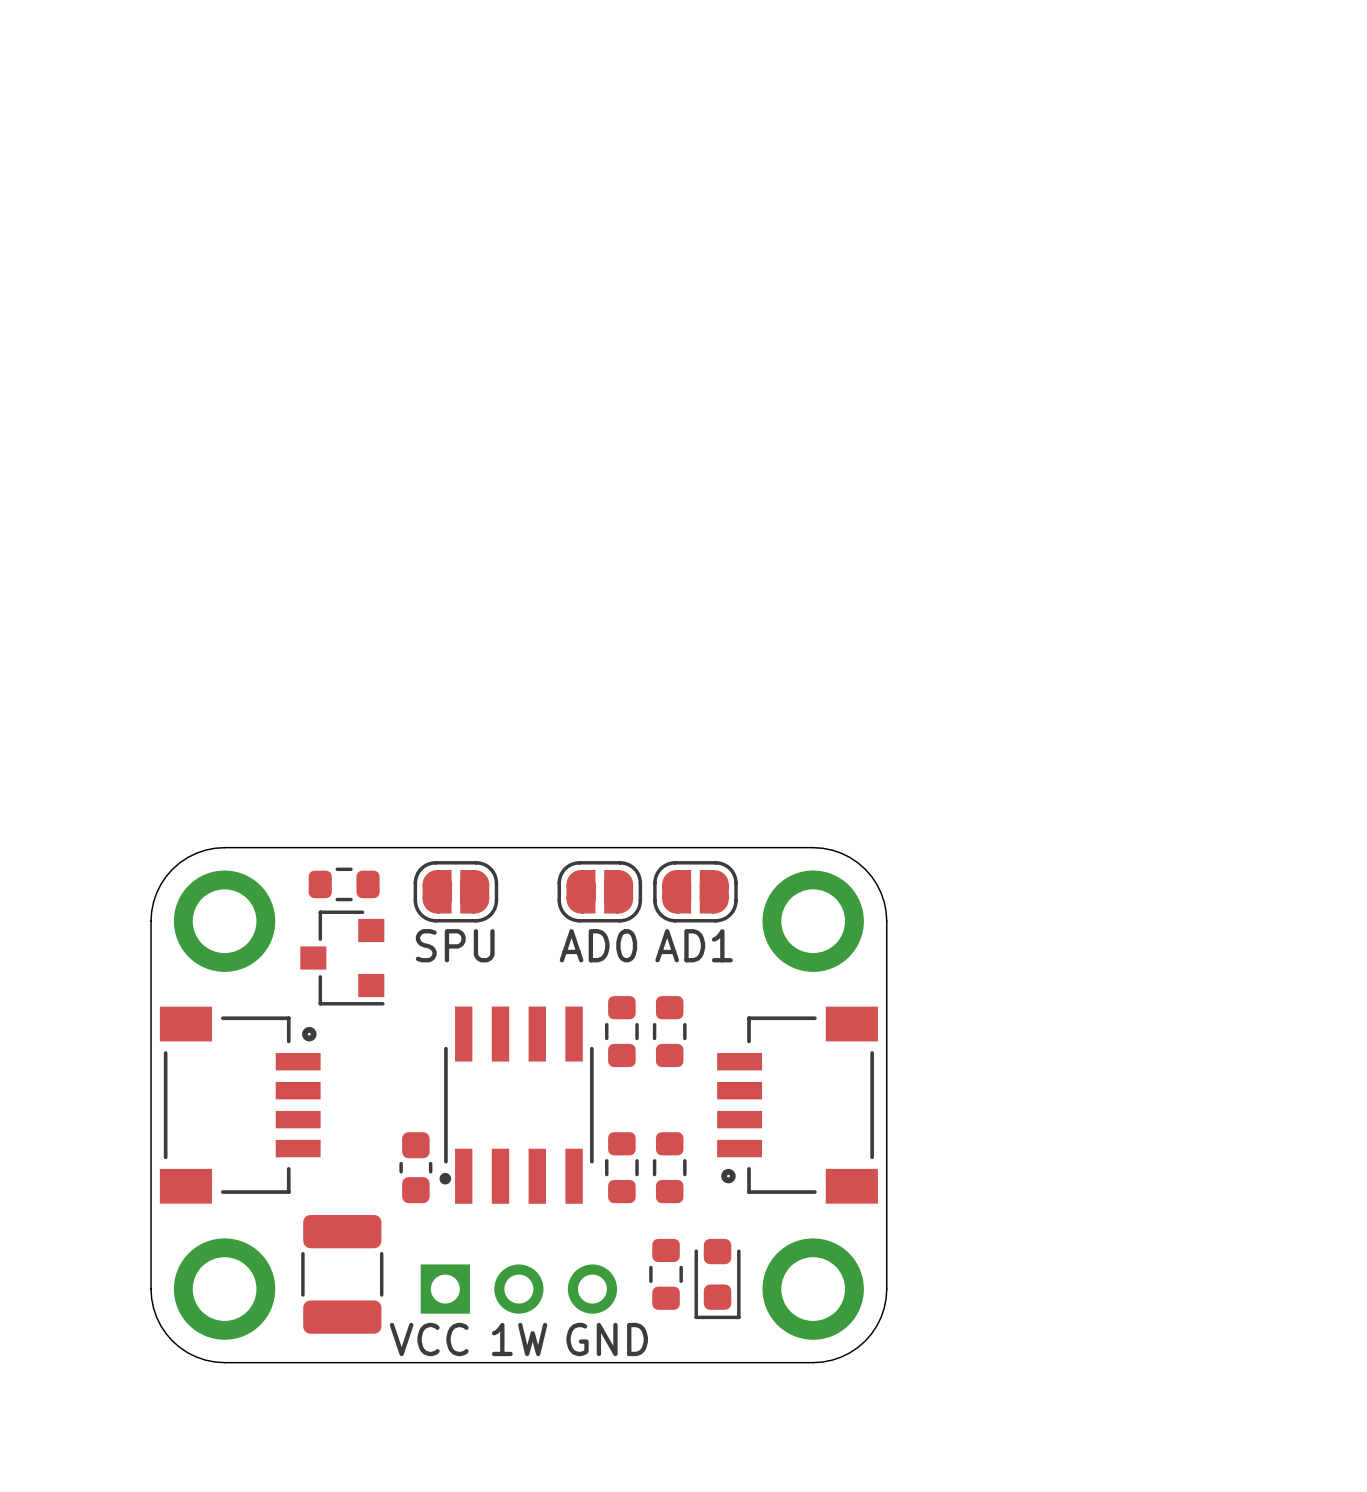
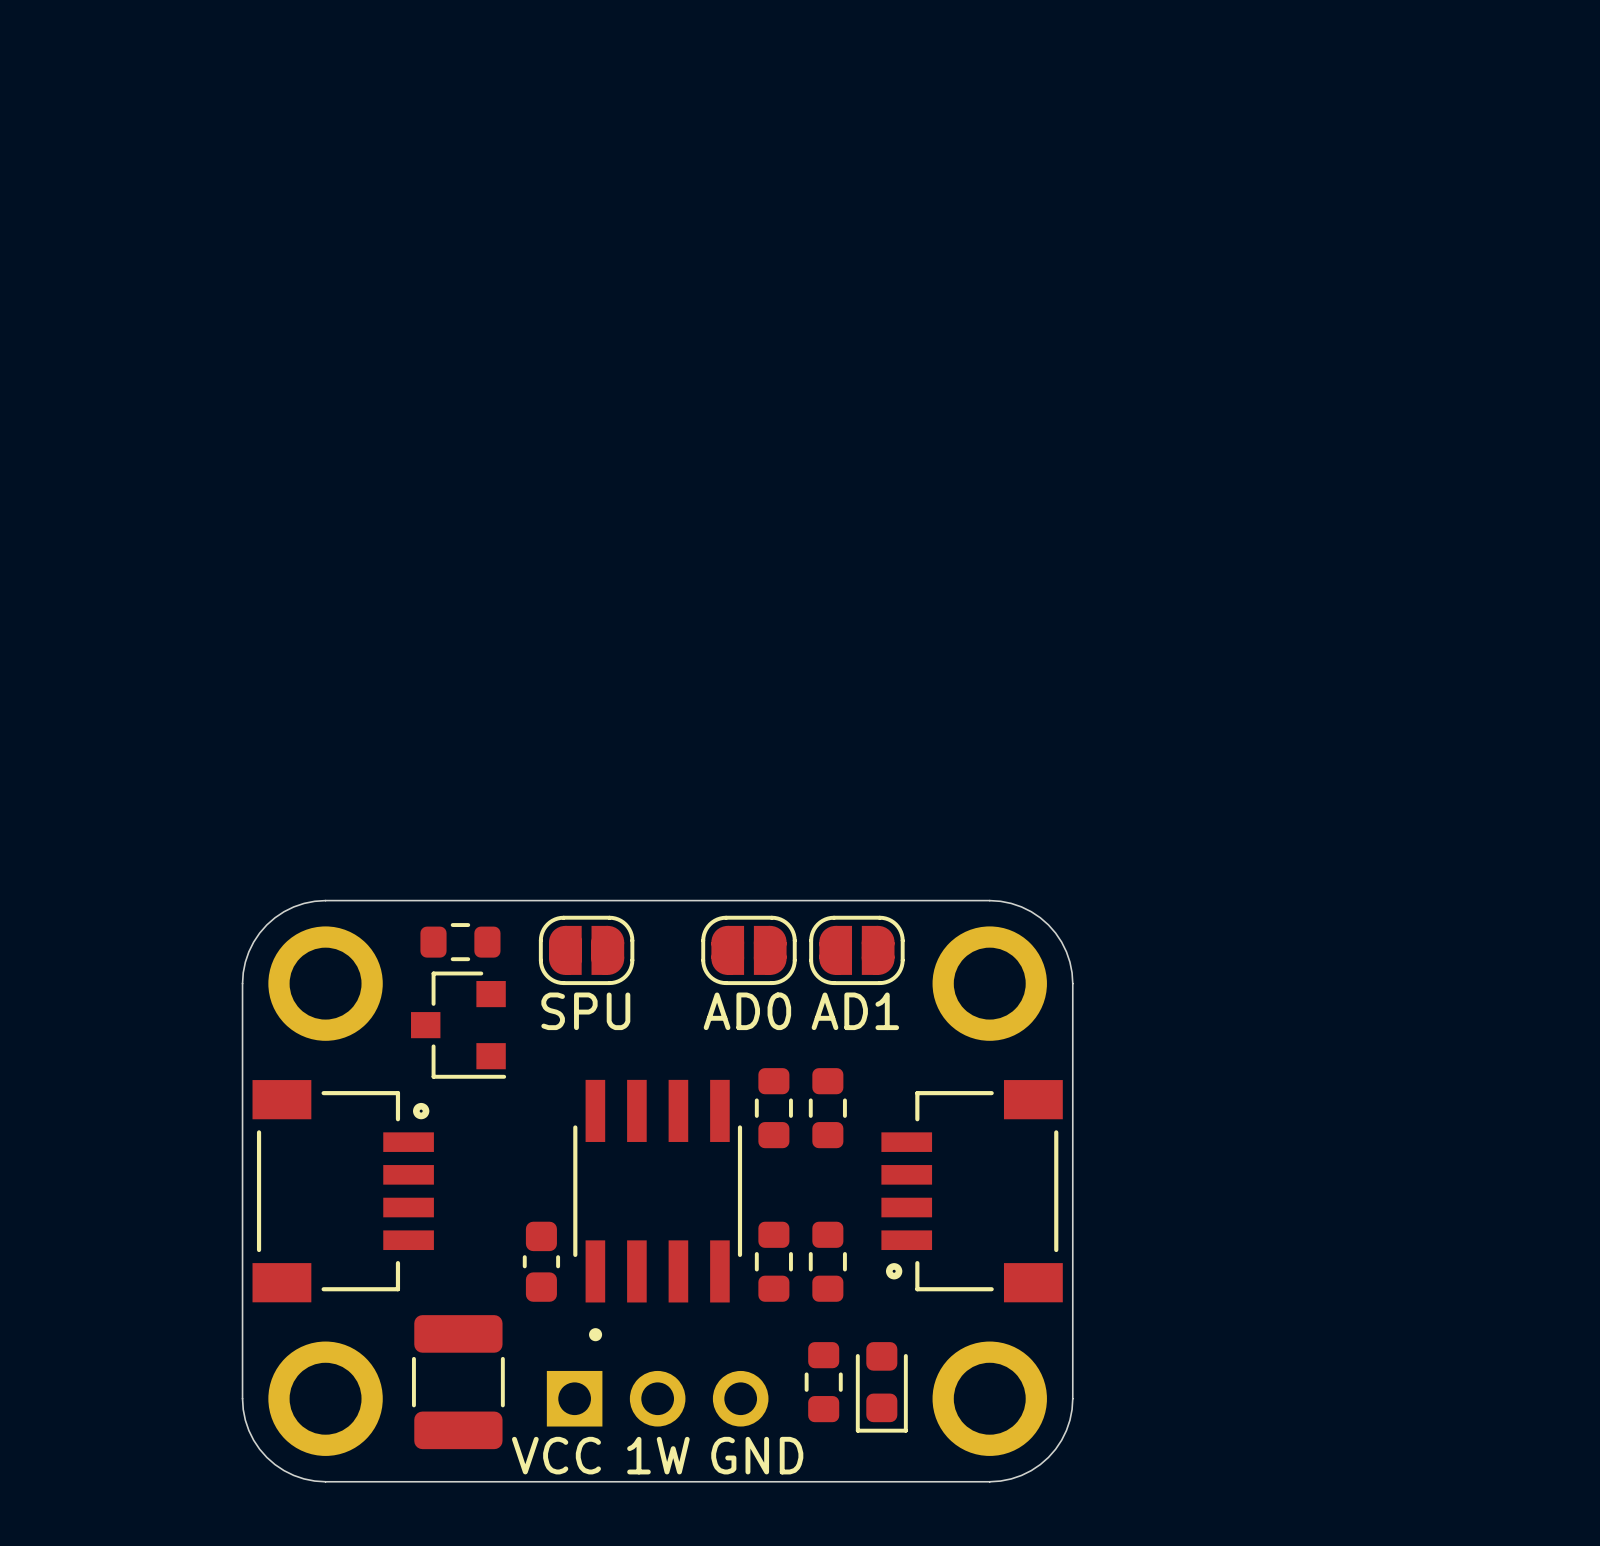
part footprint: [439, 1006, 594, 1204] -> [573, 1079, 743, 1342]

